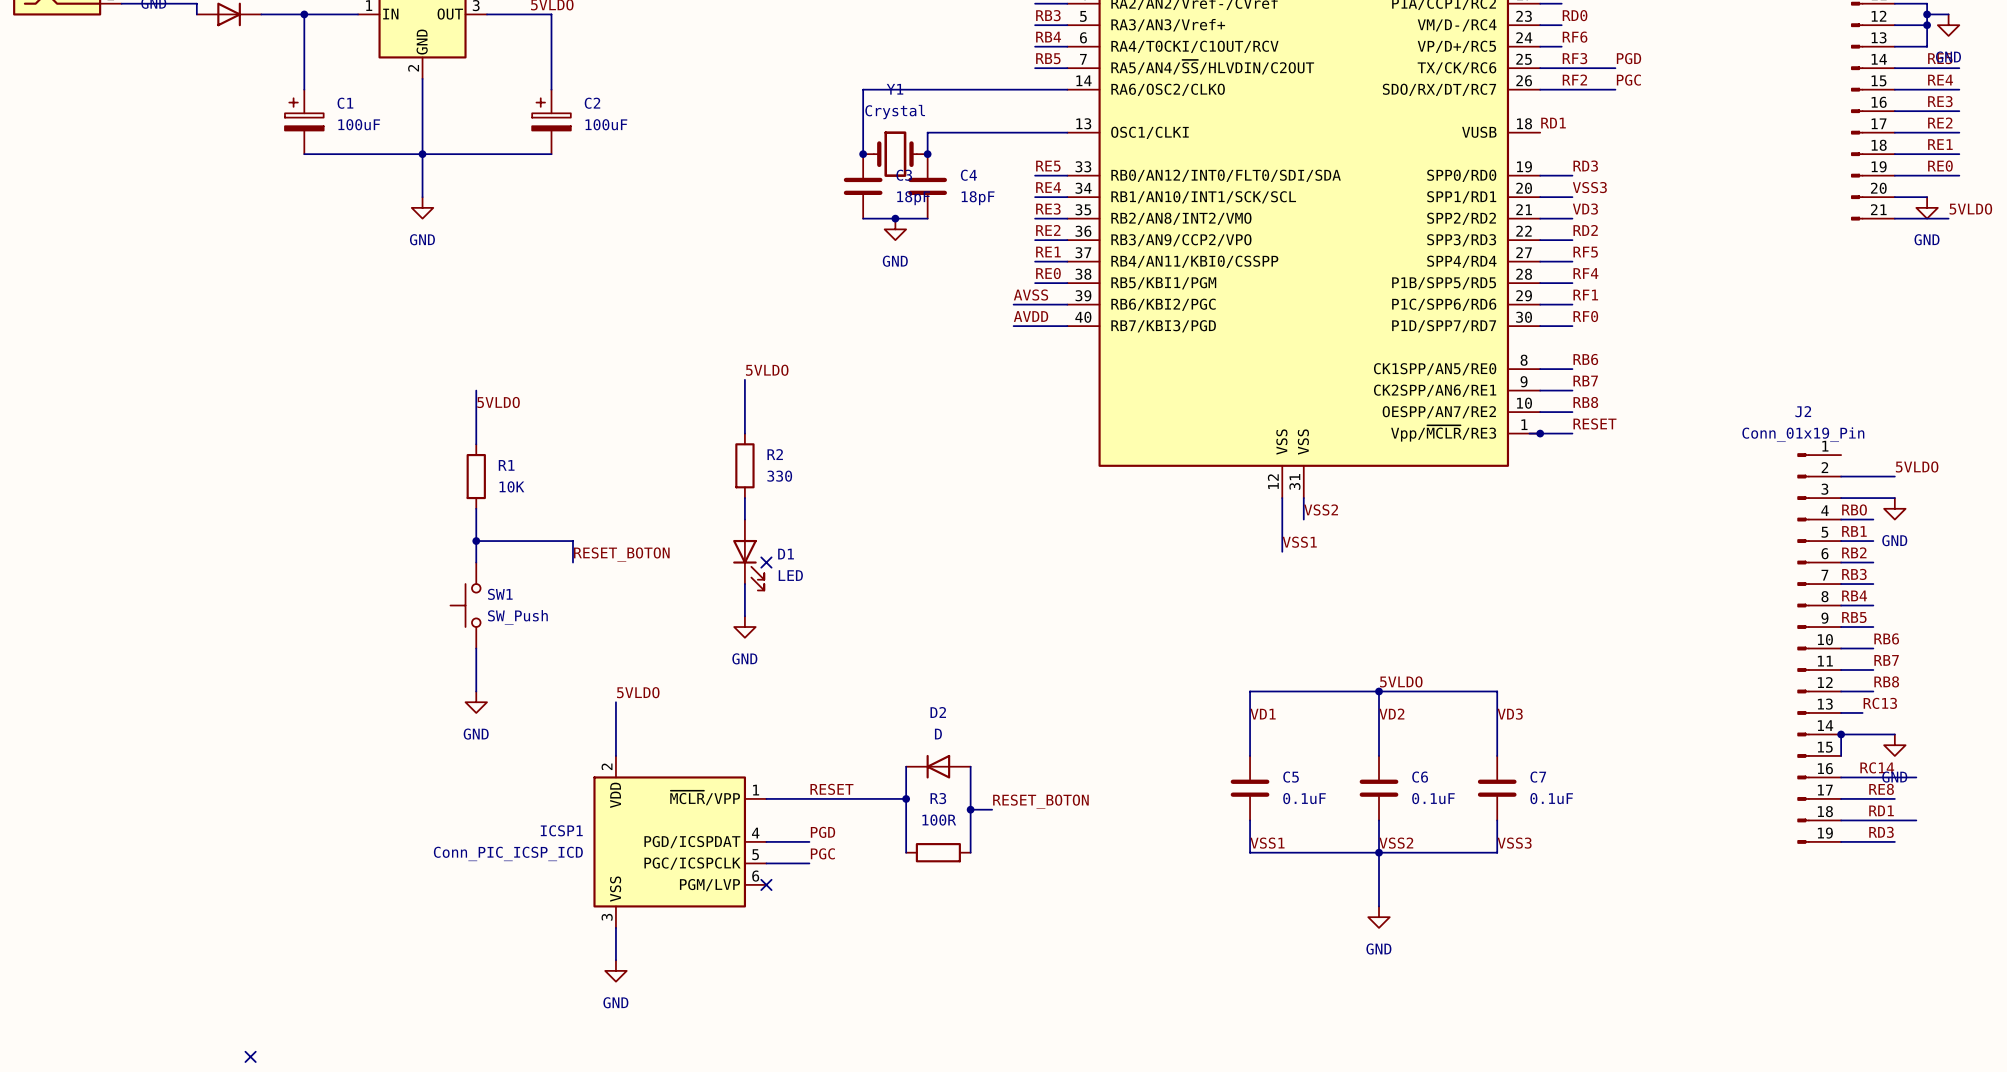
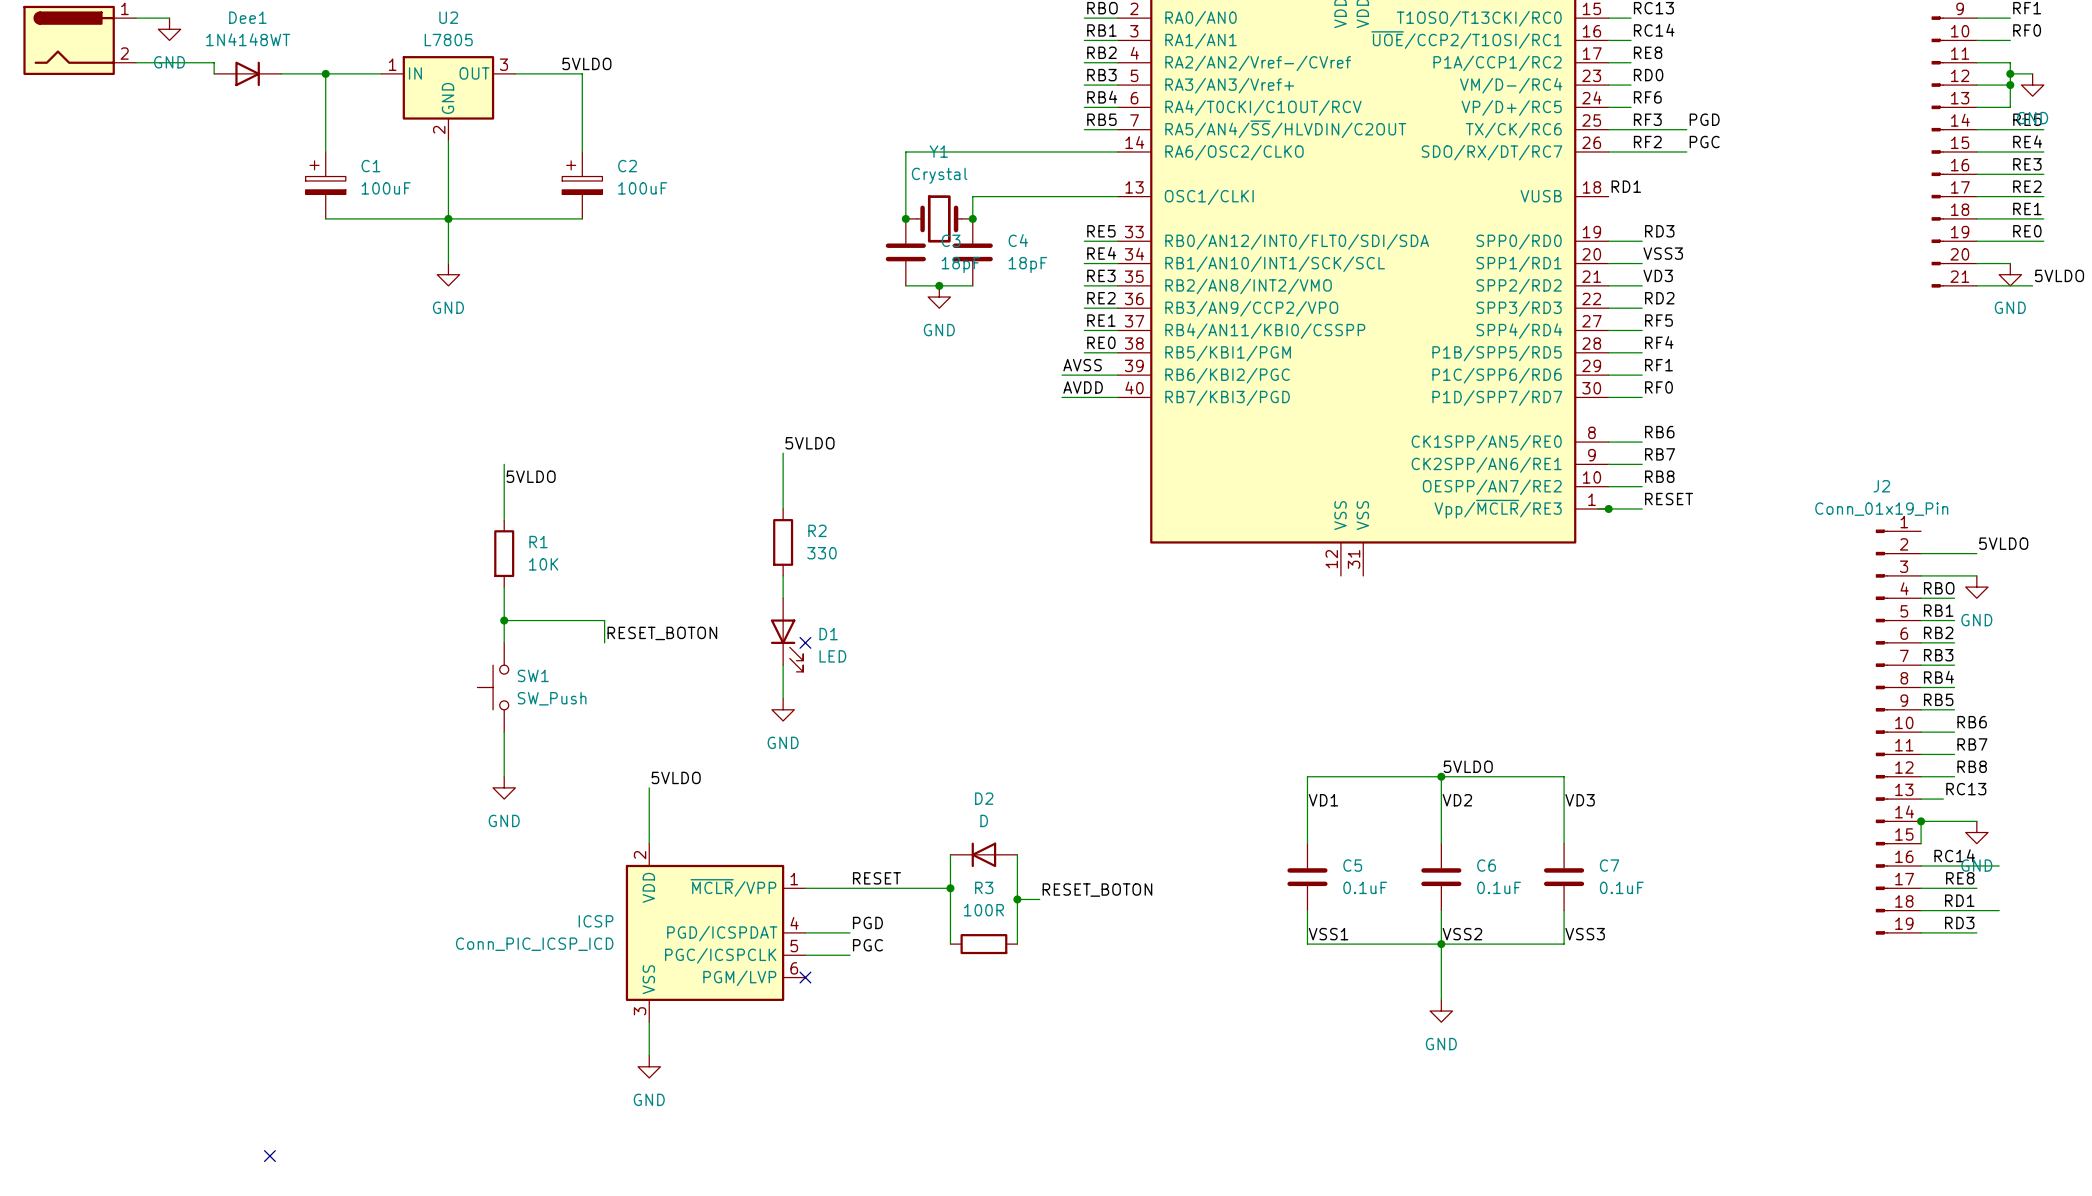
wire: (1282, 498) (1282, 551) -> none
wire: (1303, 498) (1303, 519) -> none
label: VSS2 (1321, 509) -> none
label: VSS1 (1299, 542) -> none
ICSP1 name: ICSP1 (561, 830) -> ICSP (596, 921)

